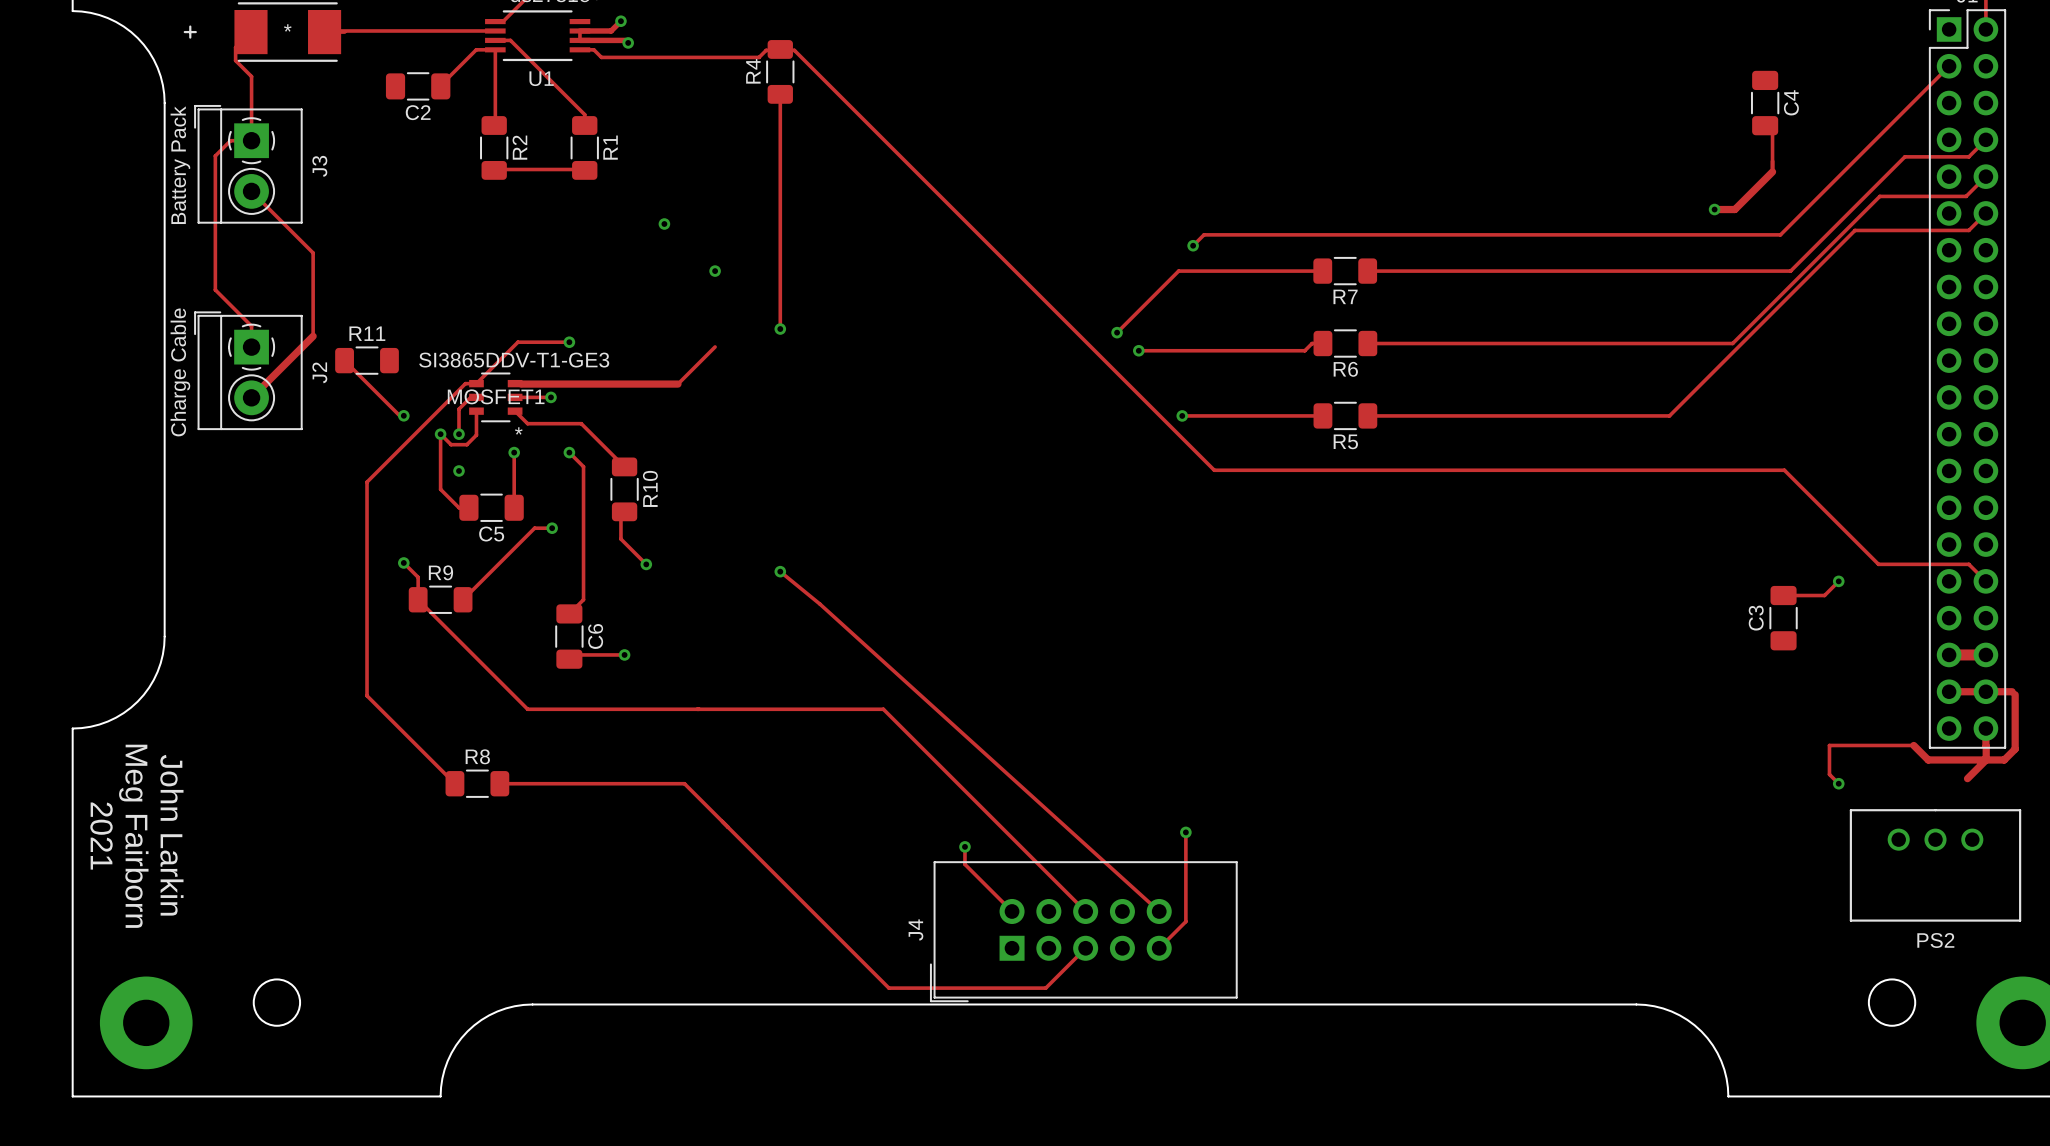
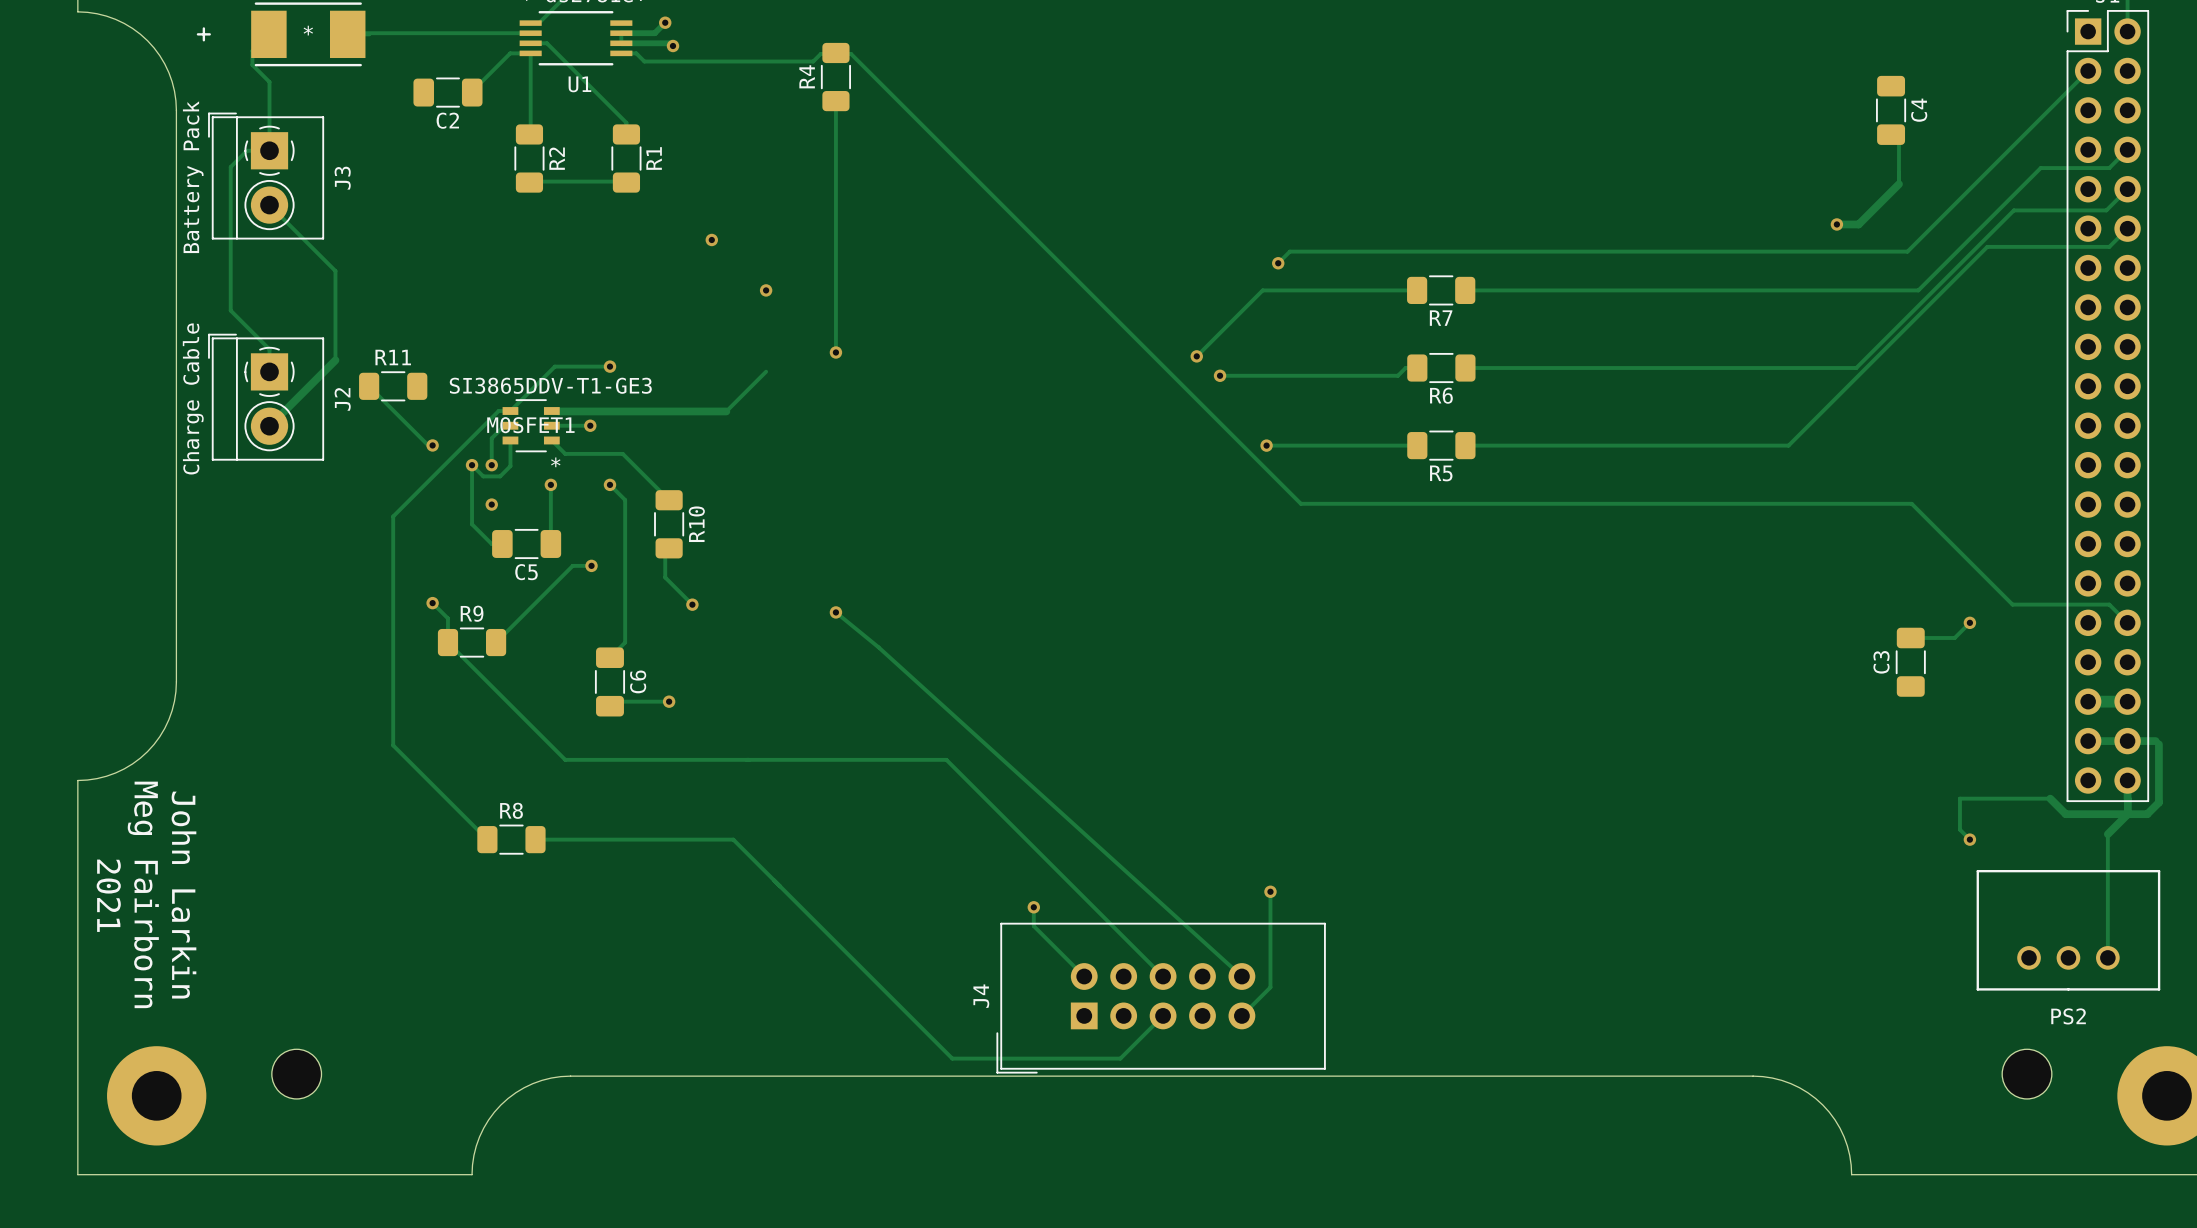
track: none -> (2107, 834) (2107, 957)
PS2 rotation: 0° (1935, 865) -> 180° (2068, 930)

